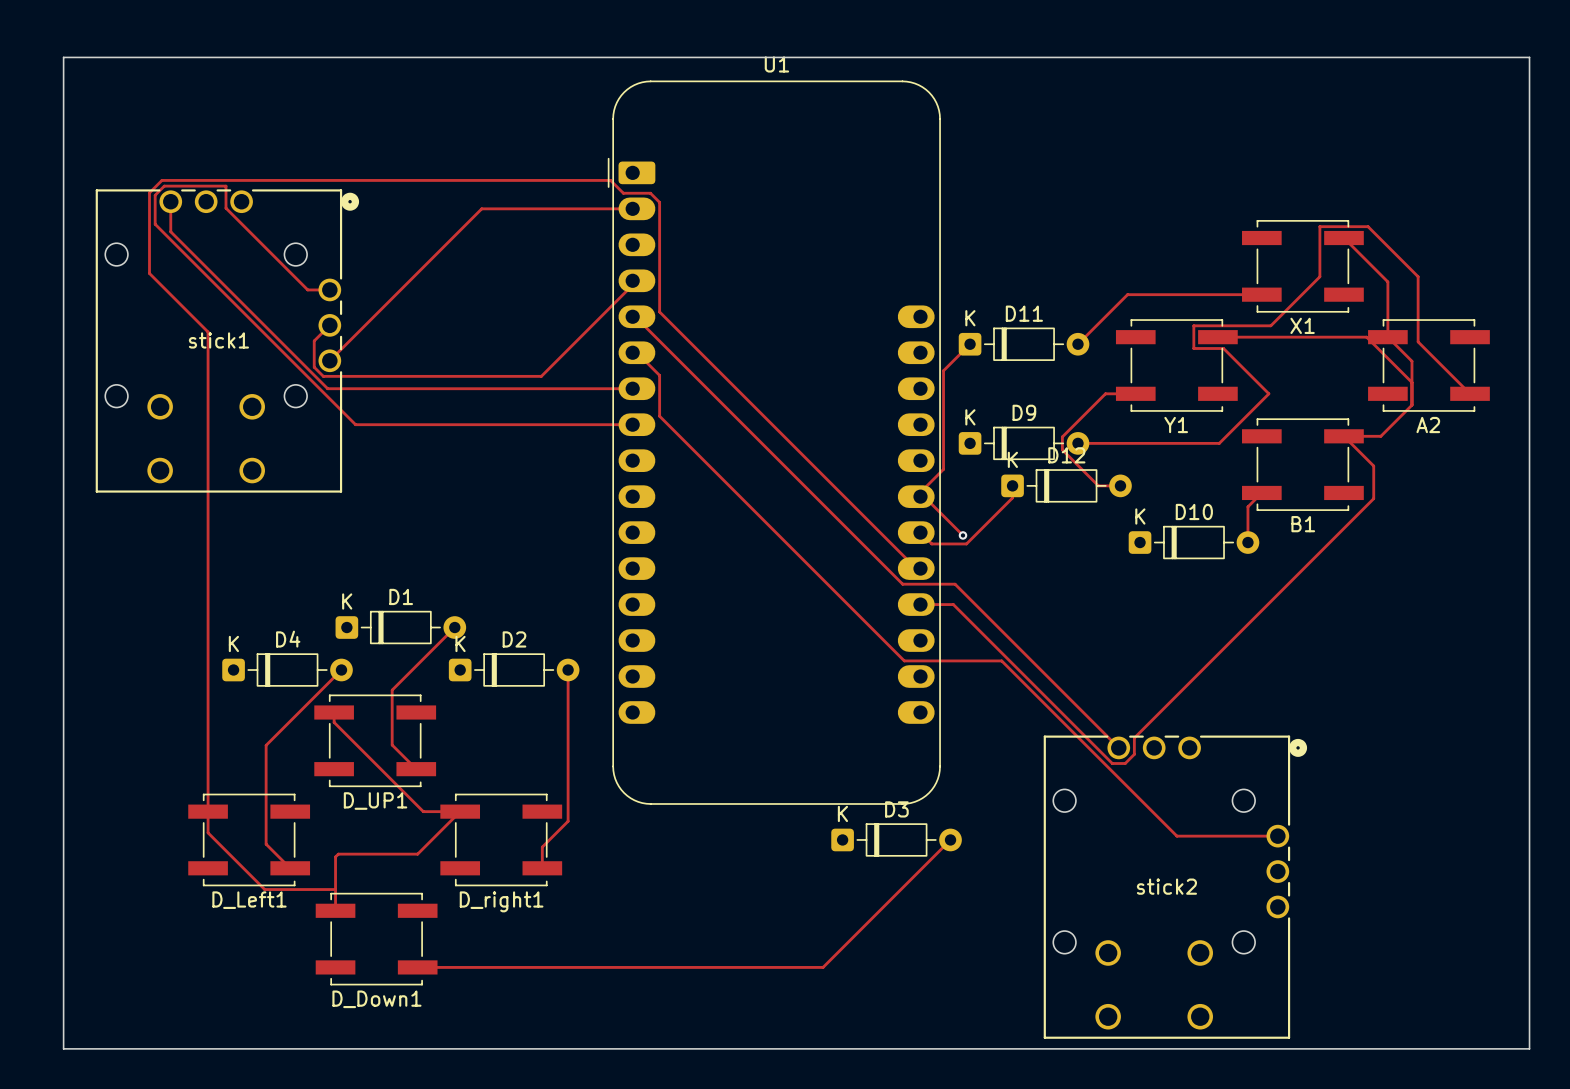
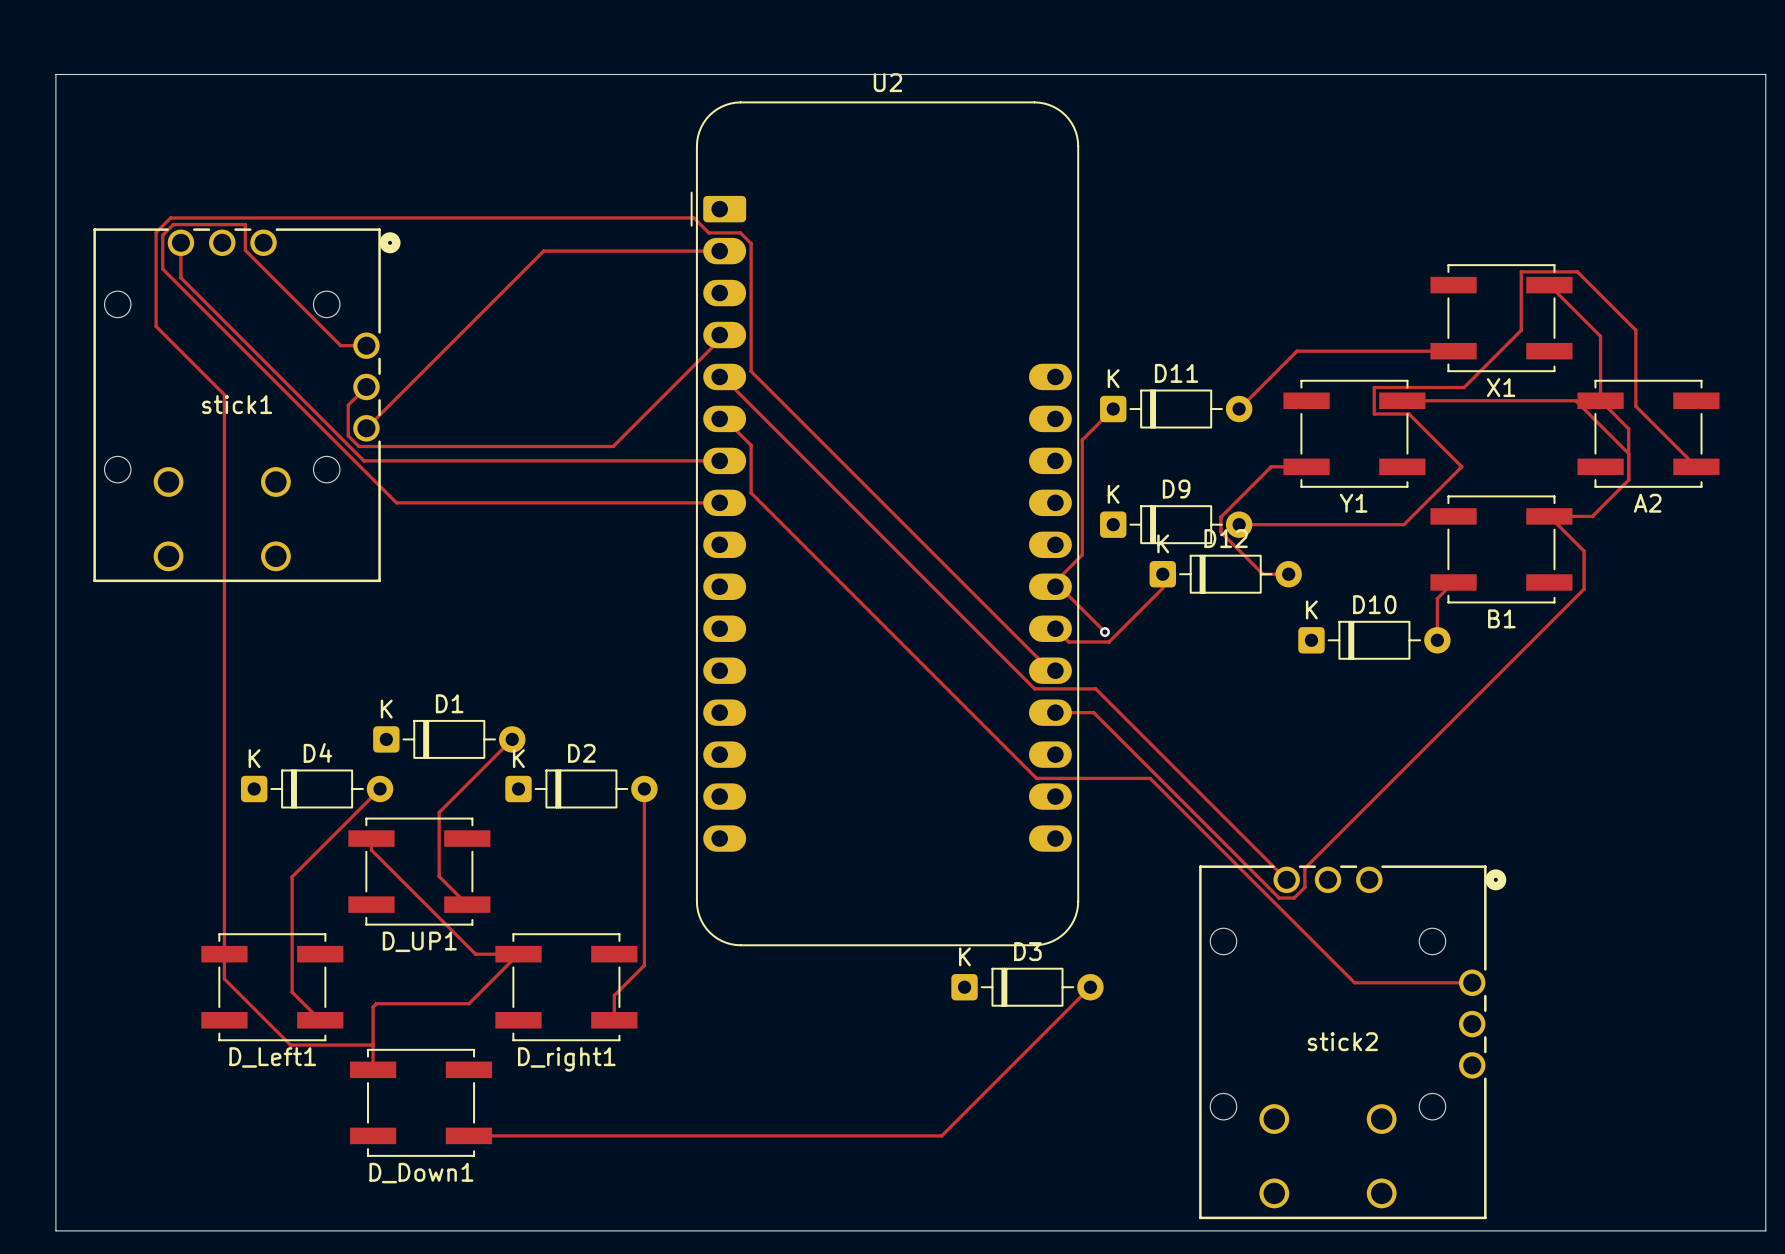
U1 name: U1 (776, 64) -> U2 (887, 82)

